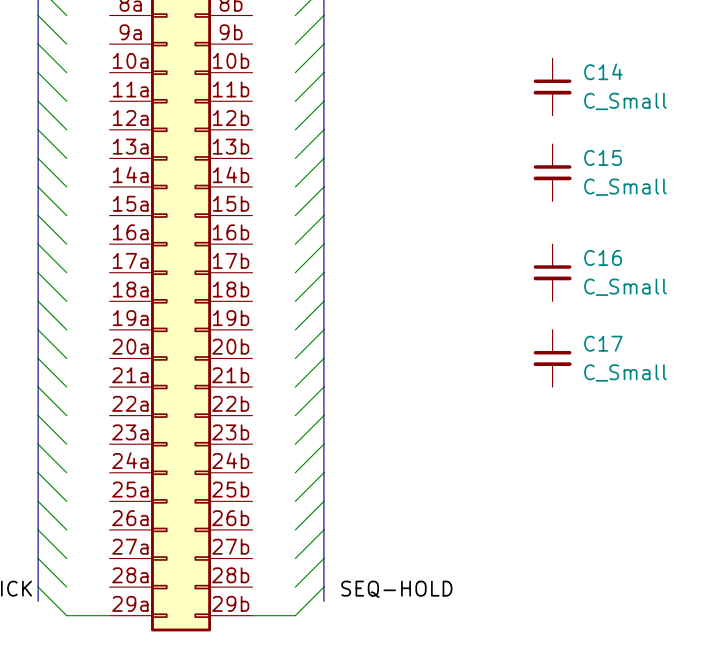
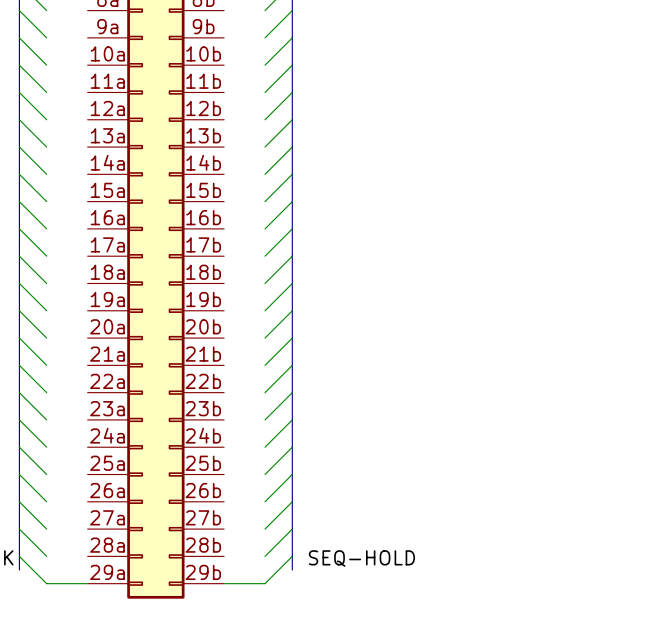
C14: C_Small (552, 86) -> none
C15: C_Small (552, 172) -> none
C16: C_Small (552, 272) -> none
C17: C_Small (552, 358) -> none

